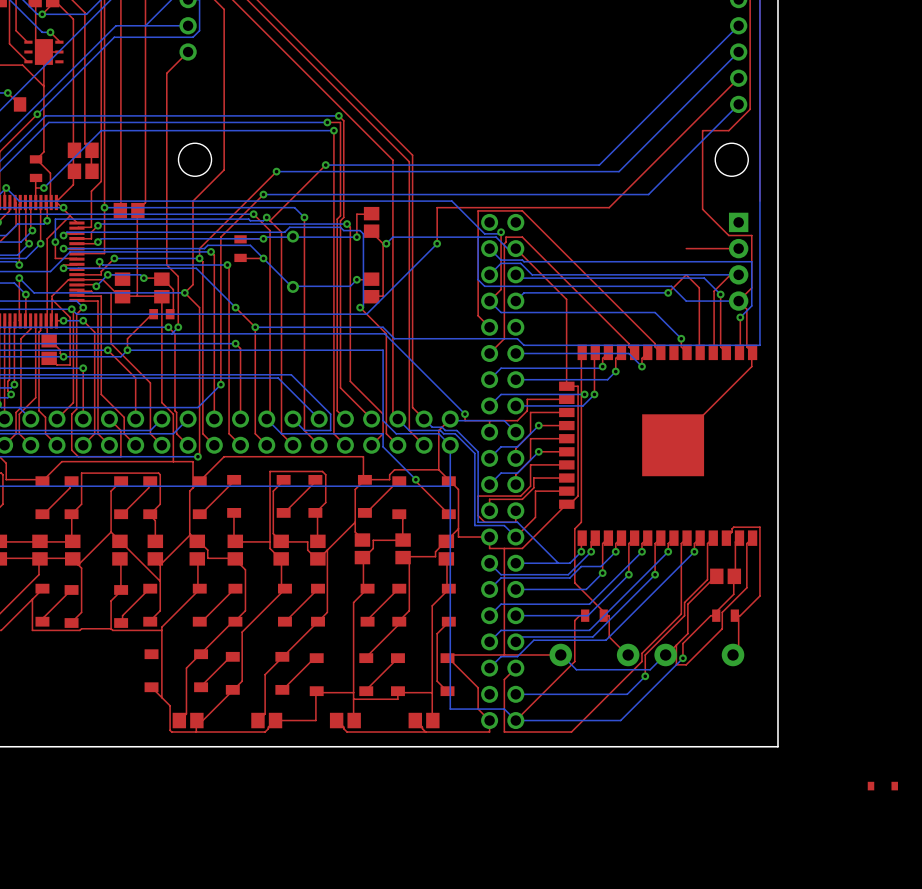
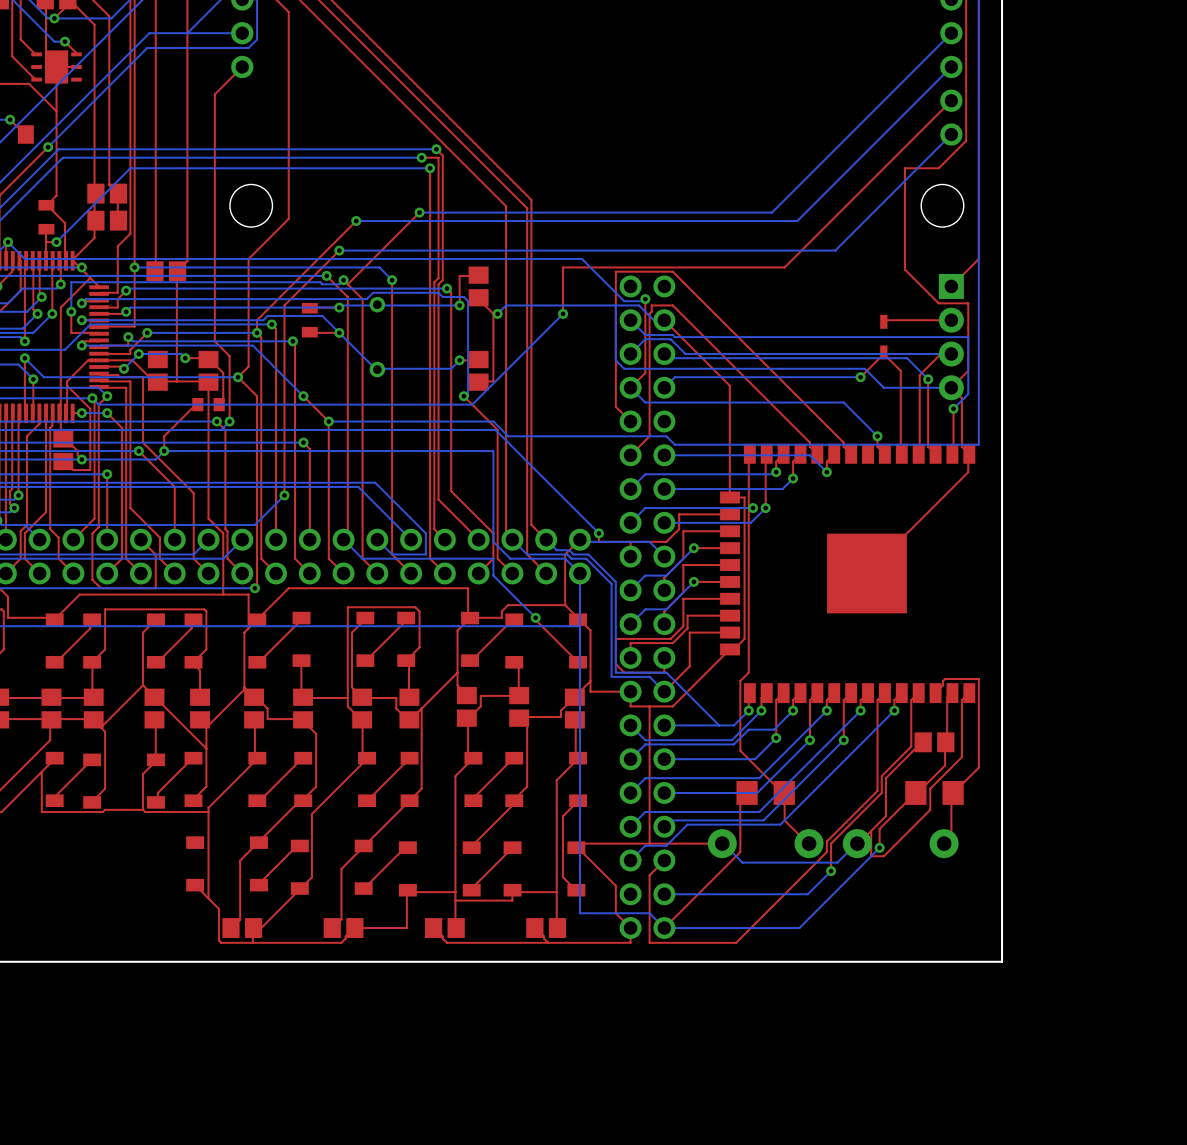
top track: none -> (978, 259) (951, 286)
part: none -> (883, 337)
part footprint: [581, 609, 608, 622] -> [736, 781, 795, 805]
part footprint: [712, 609, 739, 622] -> [905, 781, 964, 805]
part: (882, 786) -> none

